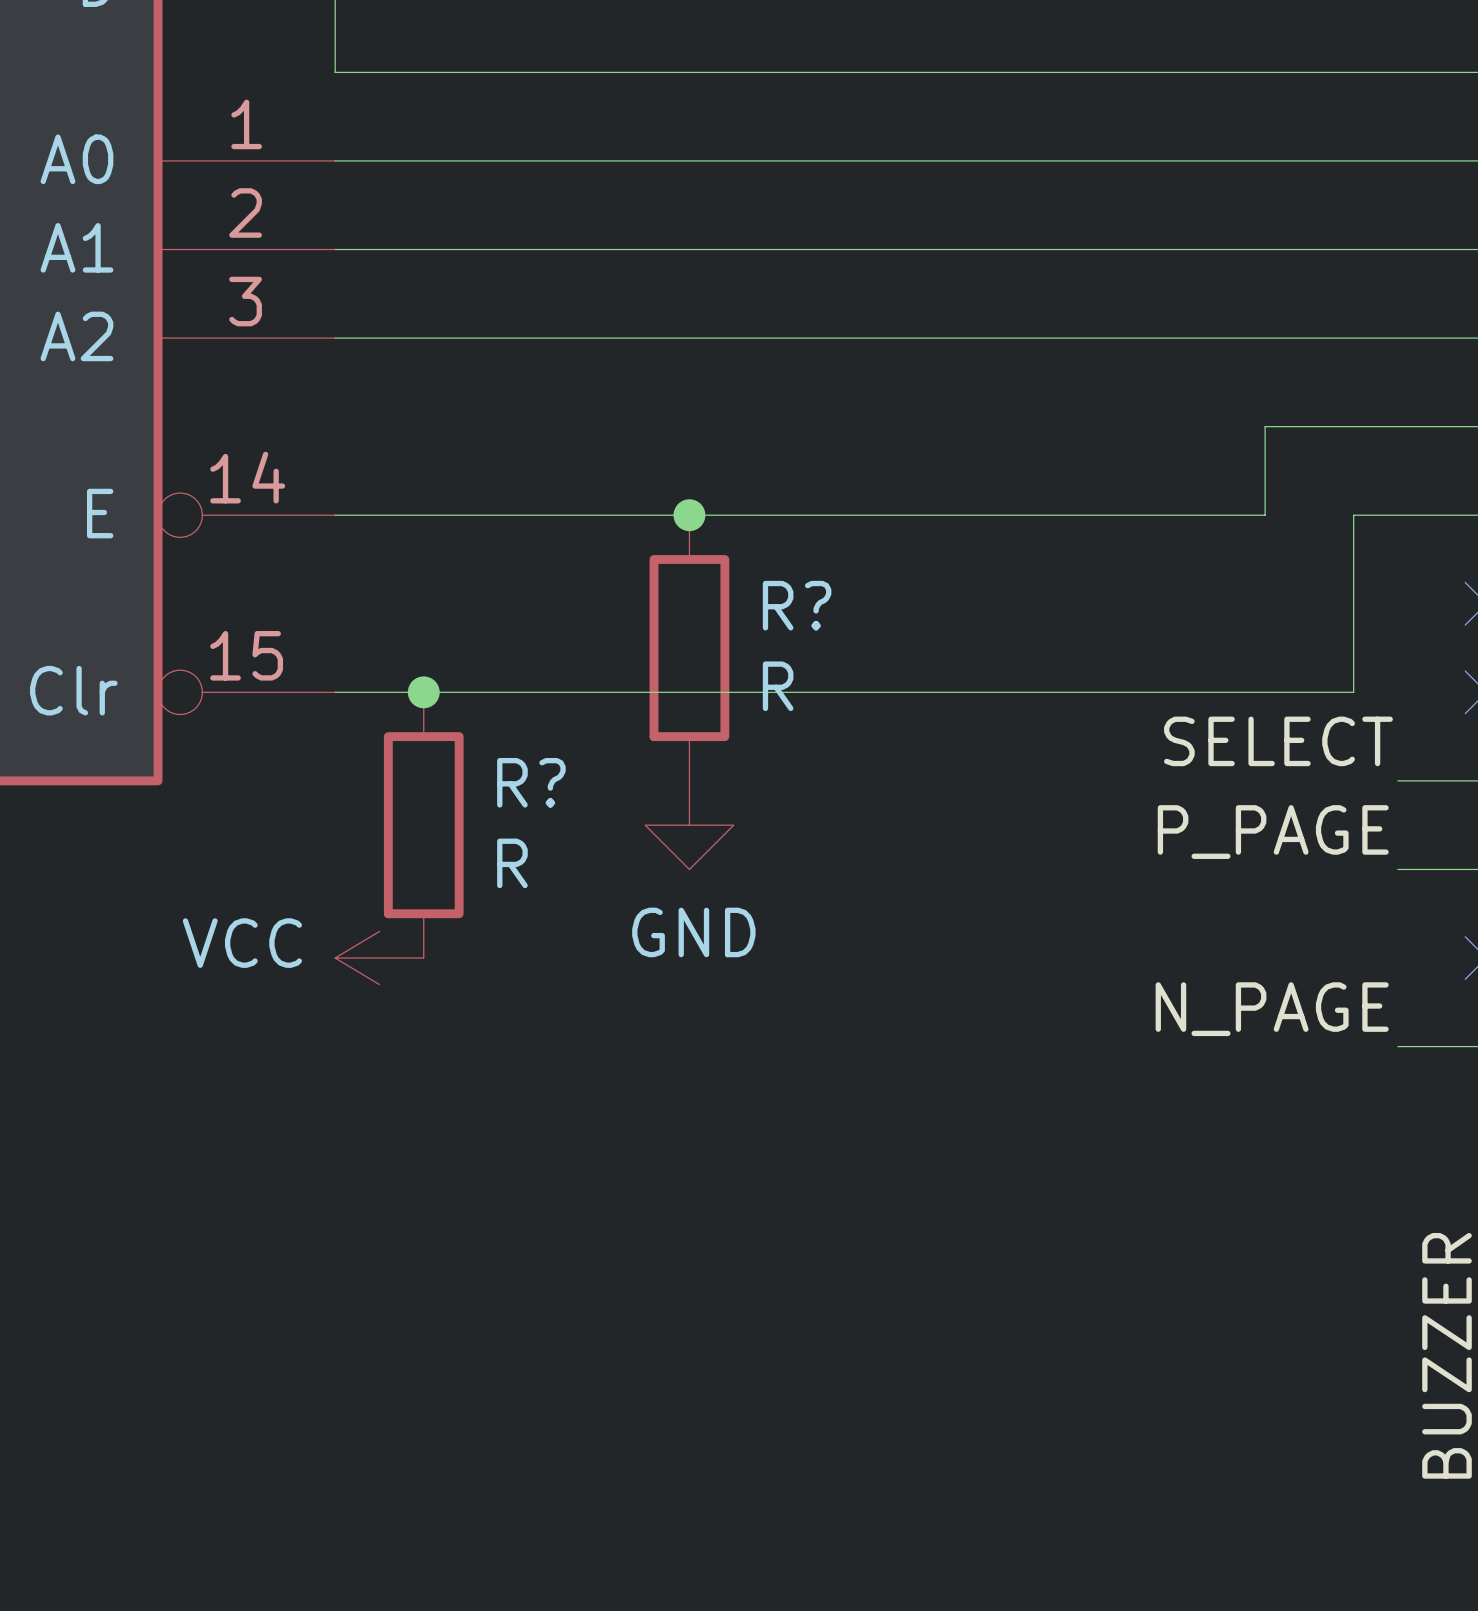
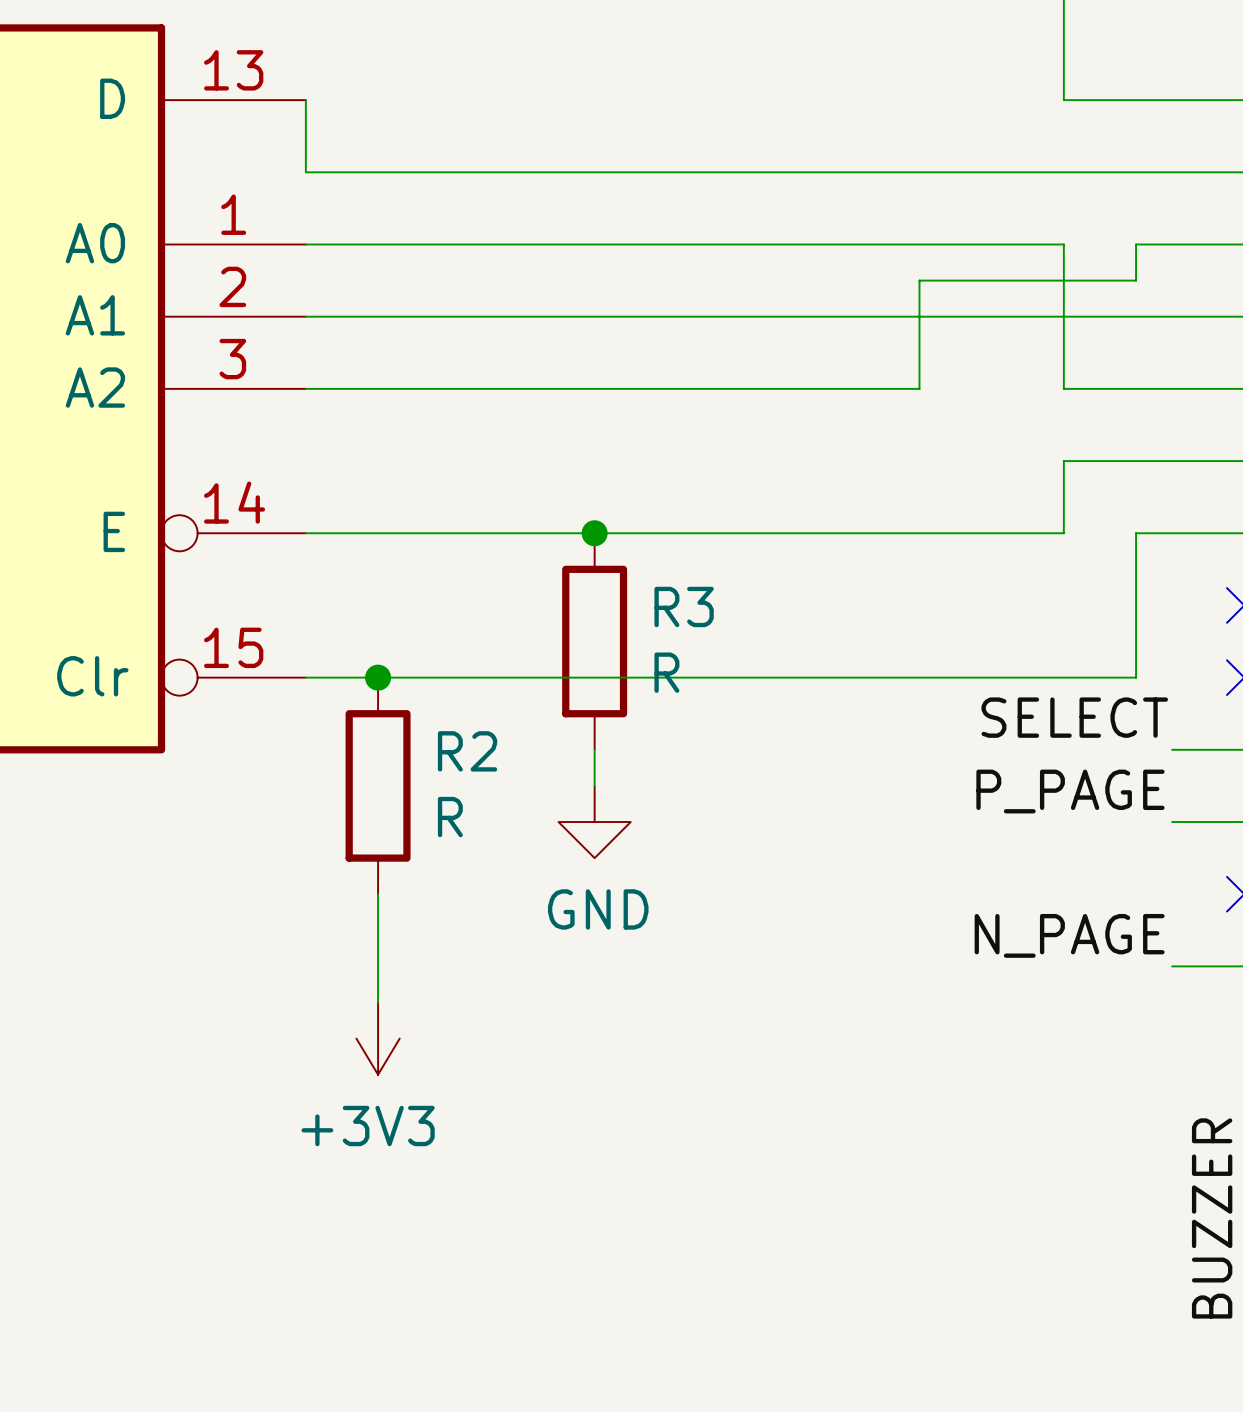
wire: (1265, 160) (1353, 160) -> (1063, 244) (1063, 388)
wire: (1087, 338) (1265, 338) -> (919, 388) (919, 280) (1136, 280) (1136, 244)
R? name: R? (797, 605) -> R3 (684, 606)
R? name: R? (531, 782) -> R2 (467, 751)
power symbol position: GND (689, 825) -> GND (594, 822)
power symbol: VCC (379, 958) -> none
wire: none -> (378, 894) (378, 1002)
power symbol: none -> +3V3 (378, 1038)

